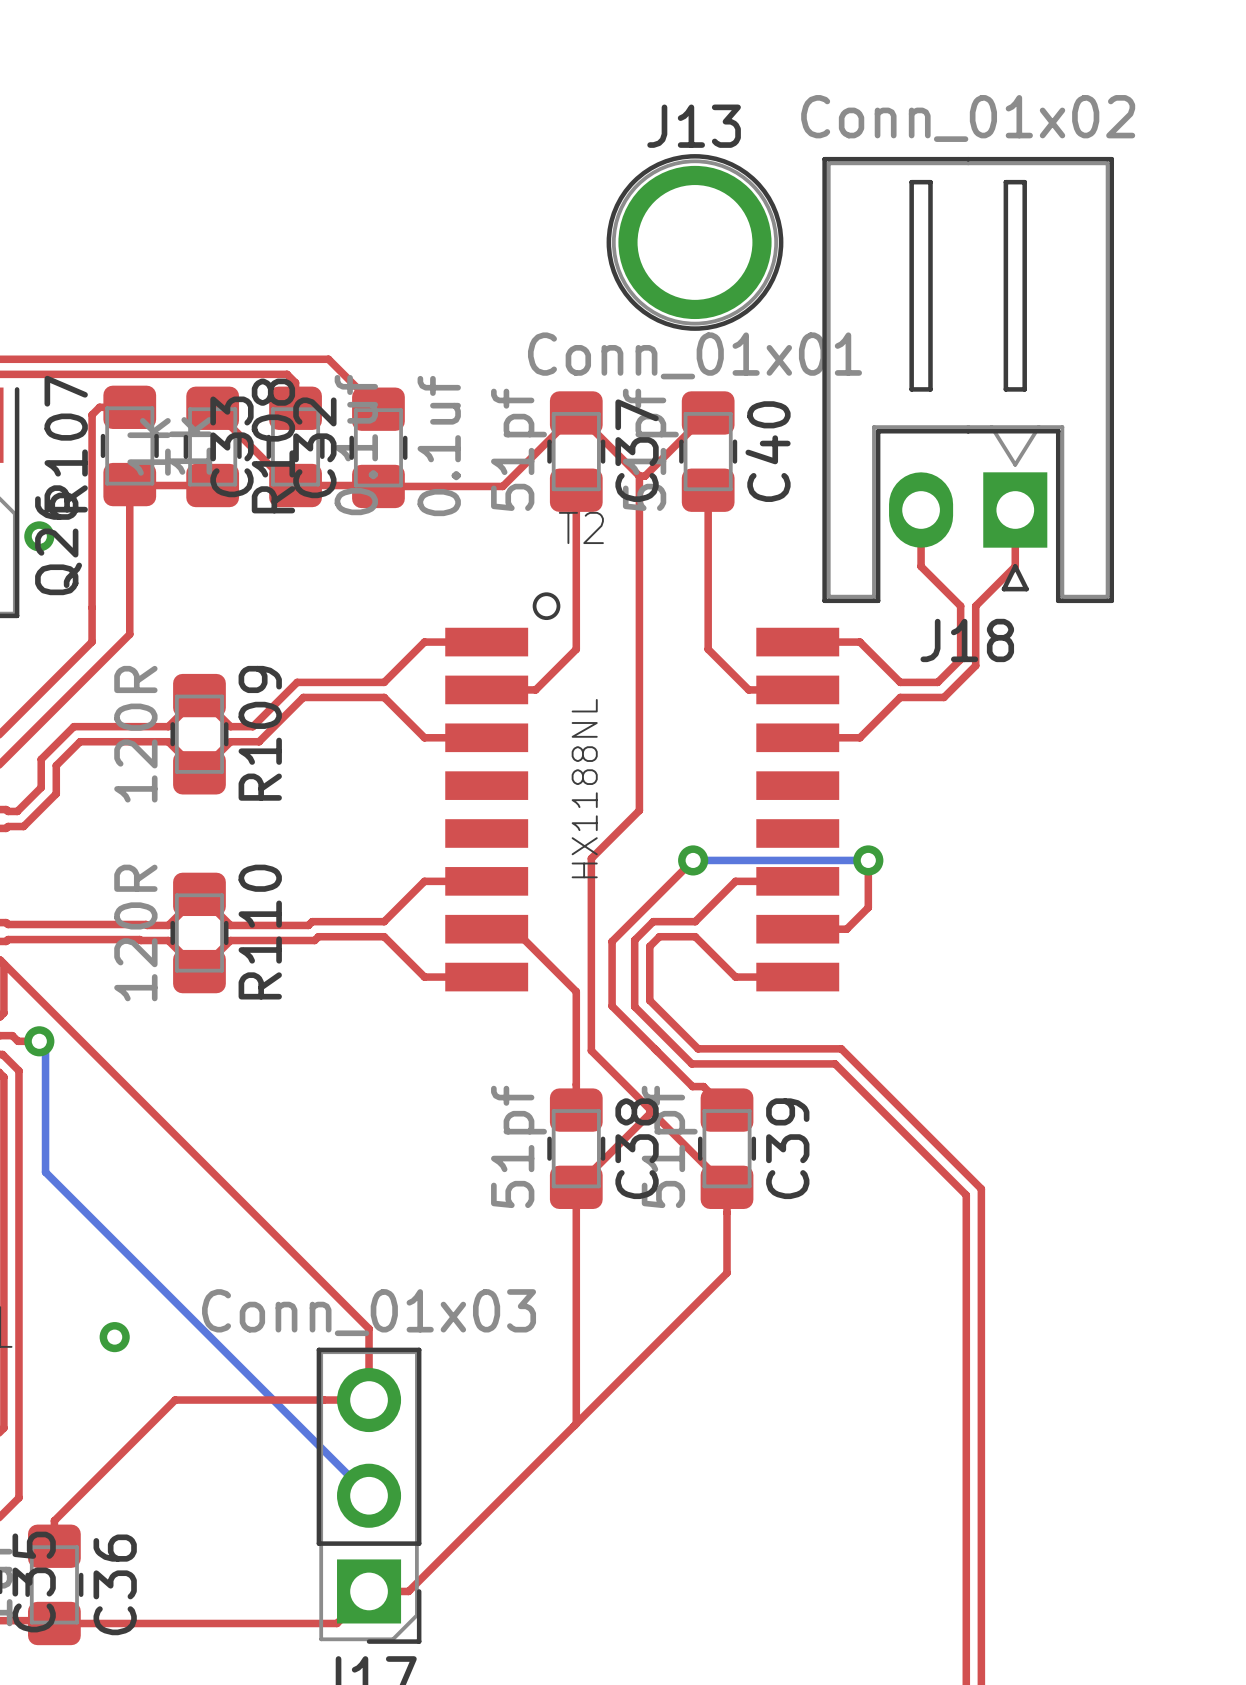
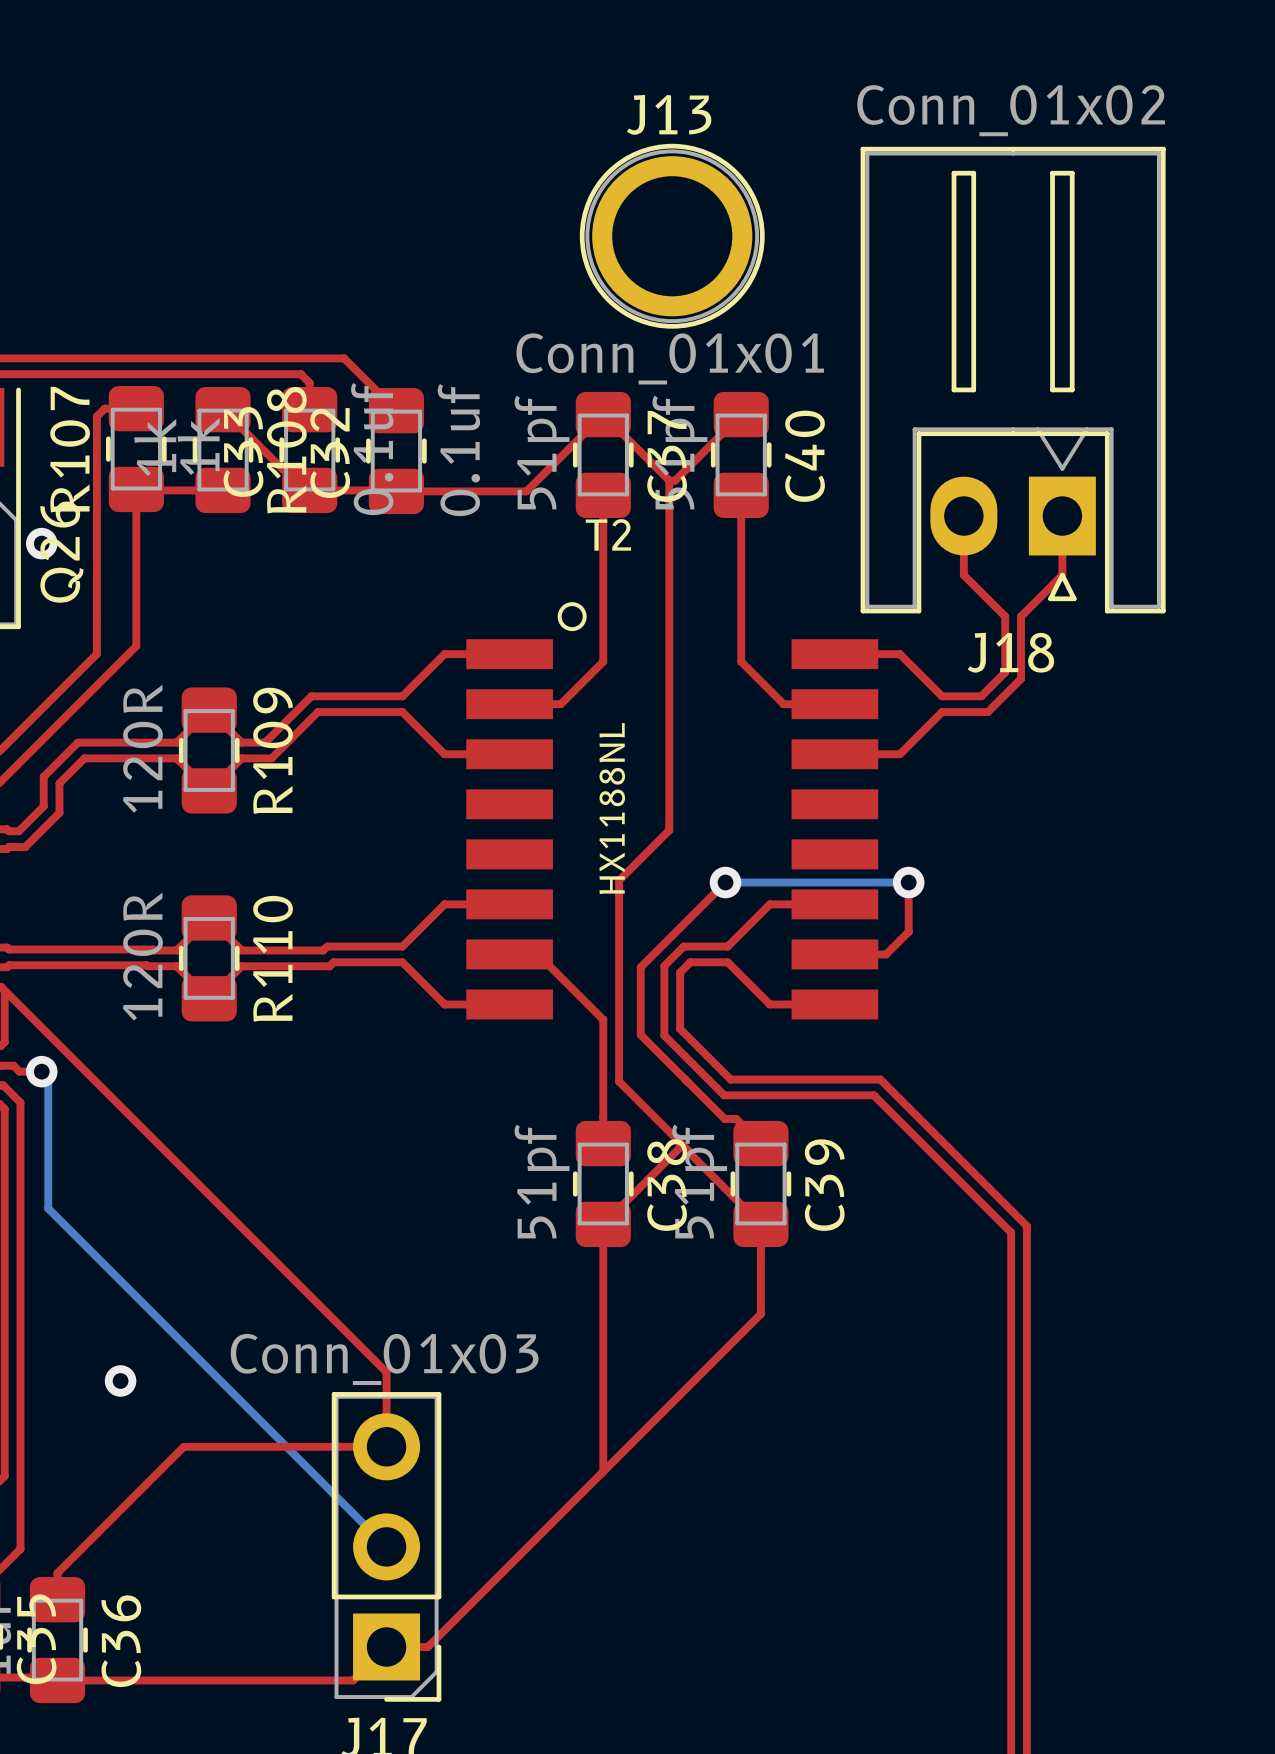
J13 position: (694, 242) -> (672, 236)

